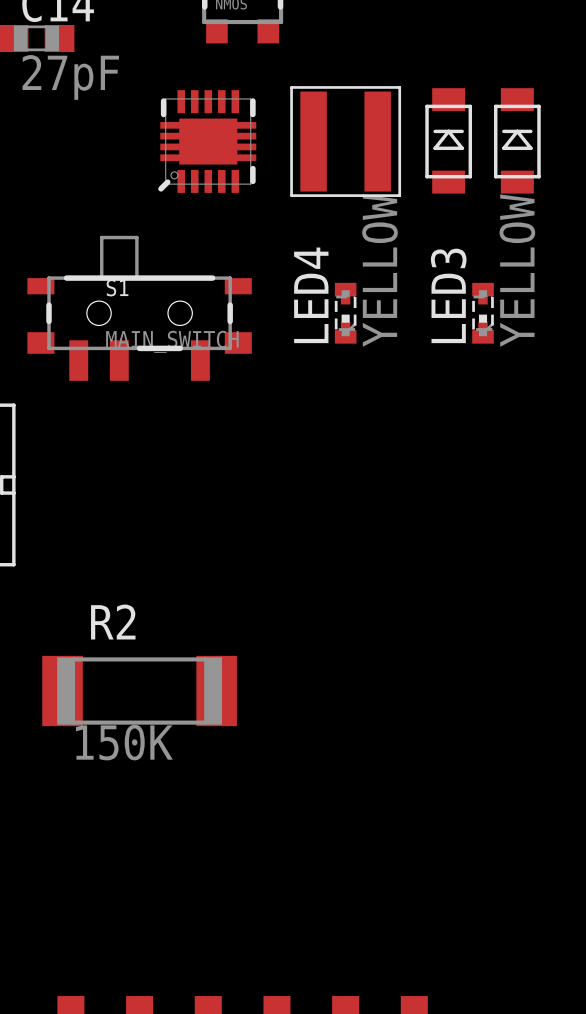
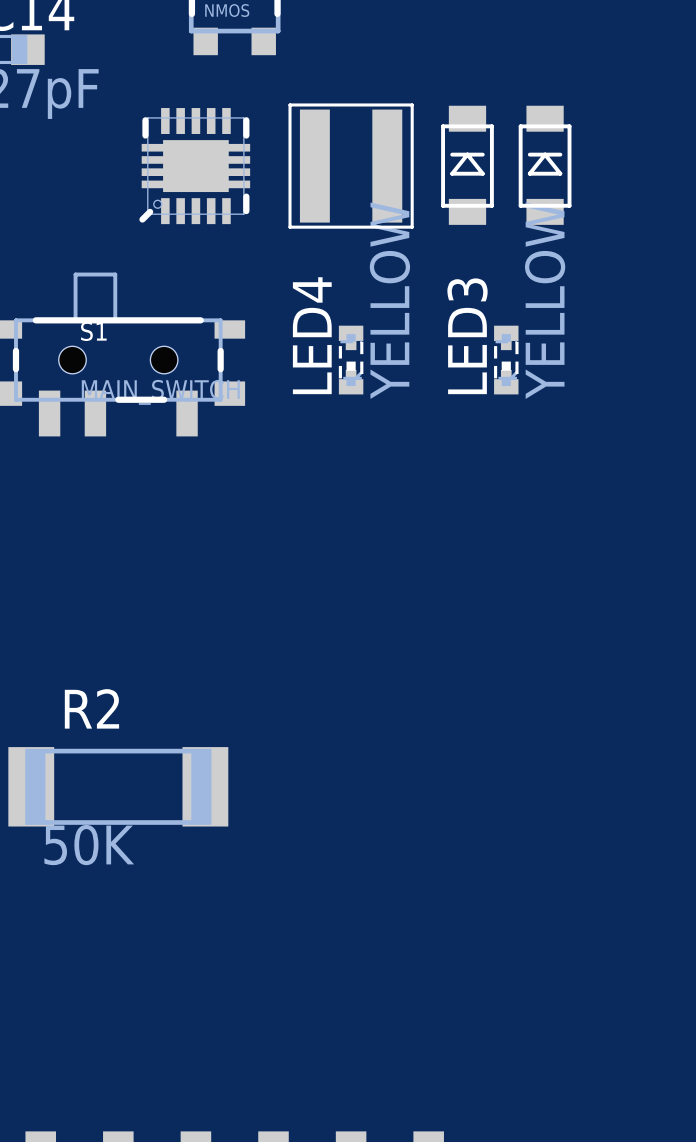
R2 value: 150K (124, 742) -> 50K (89, 845)

